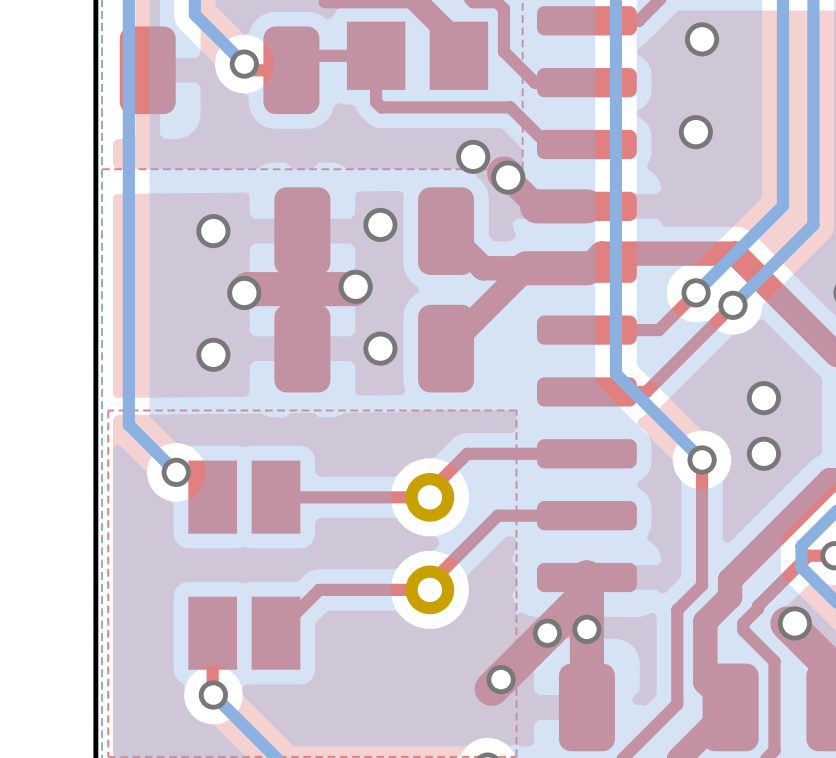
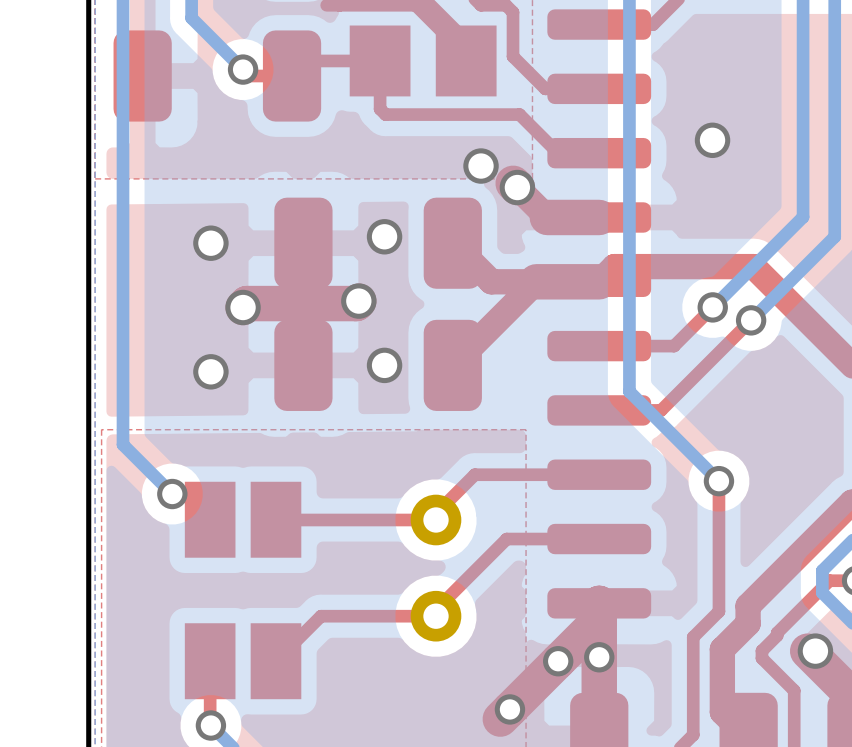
via: (702, 39) -> none
via: (763, 398) -> none
via: (763, 453) -> none

